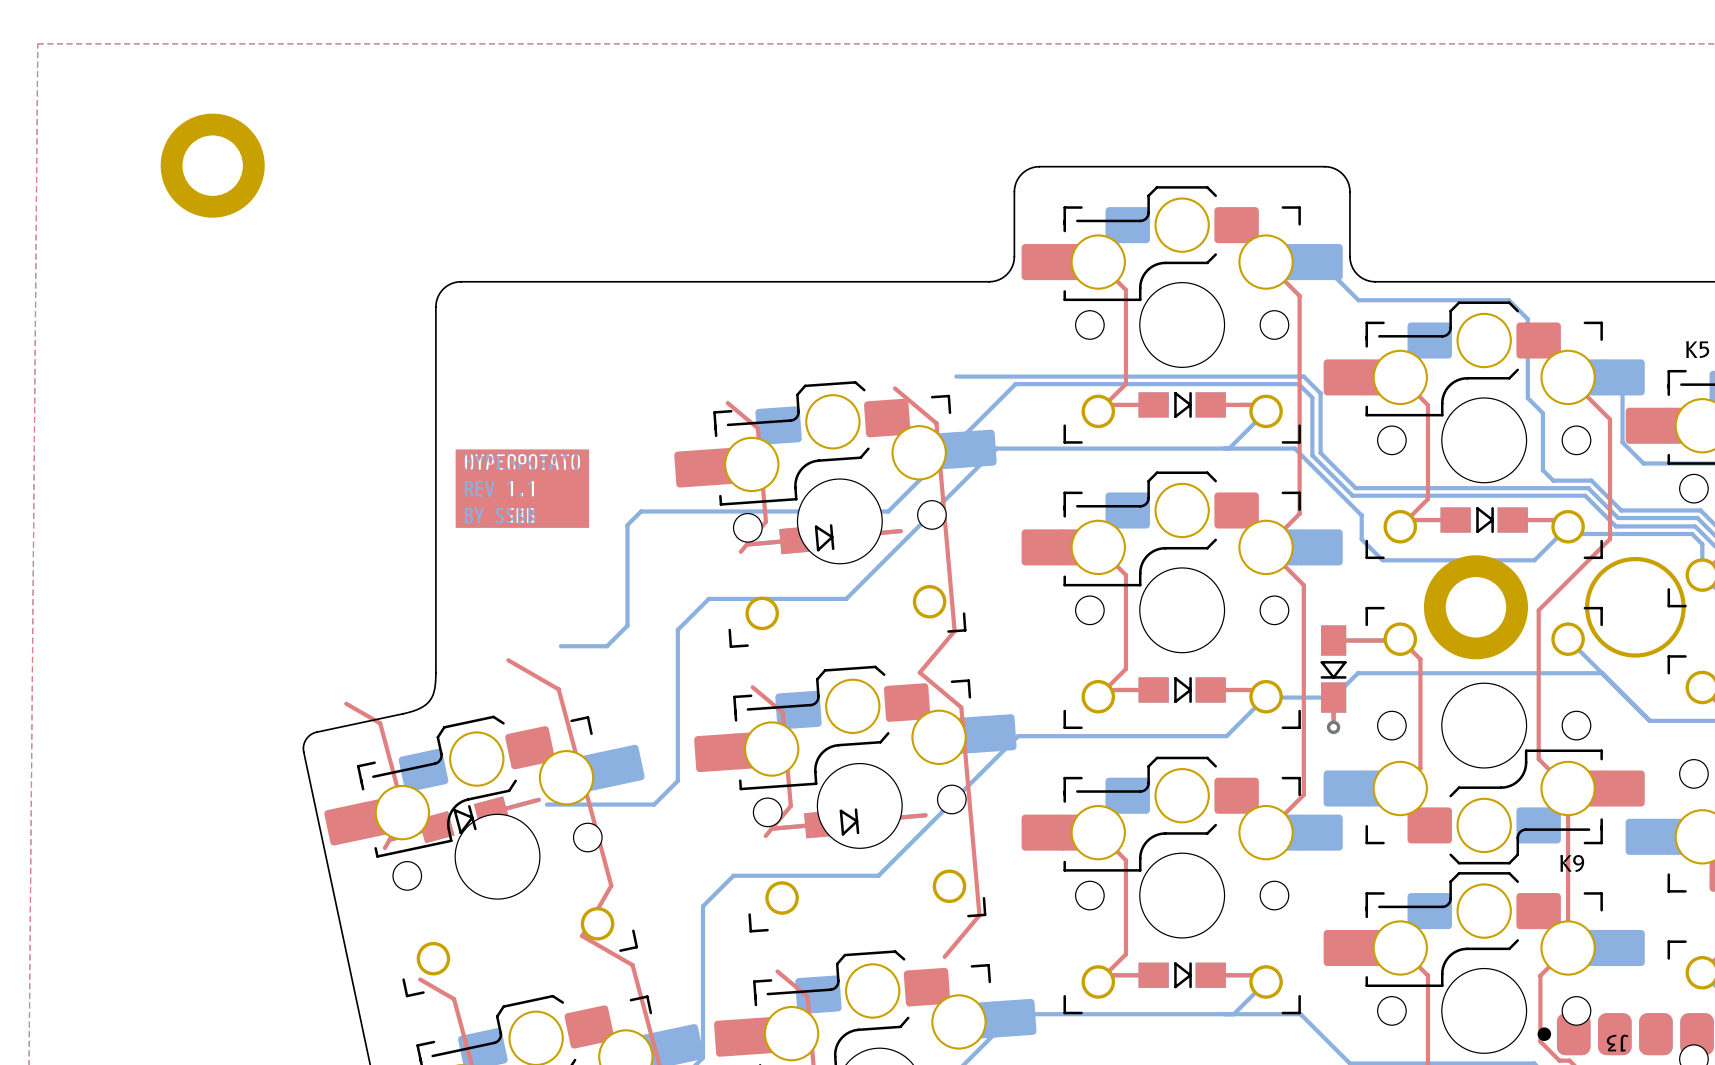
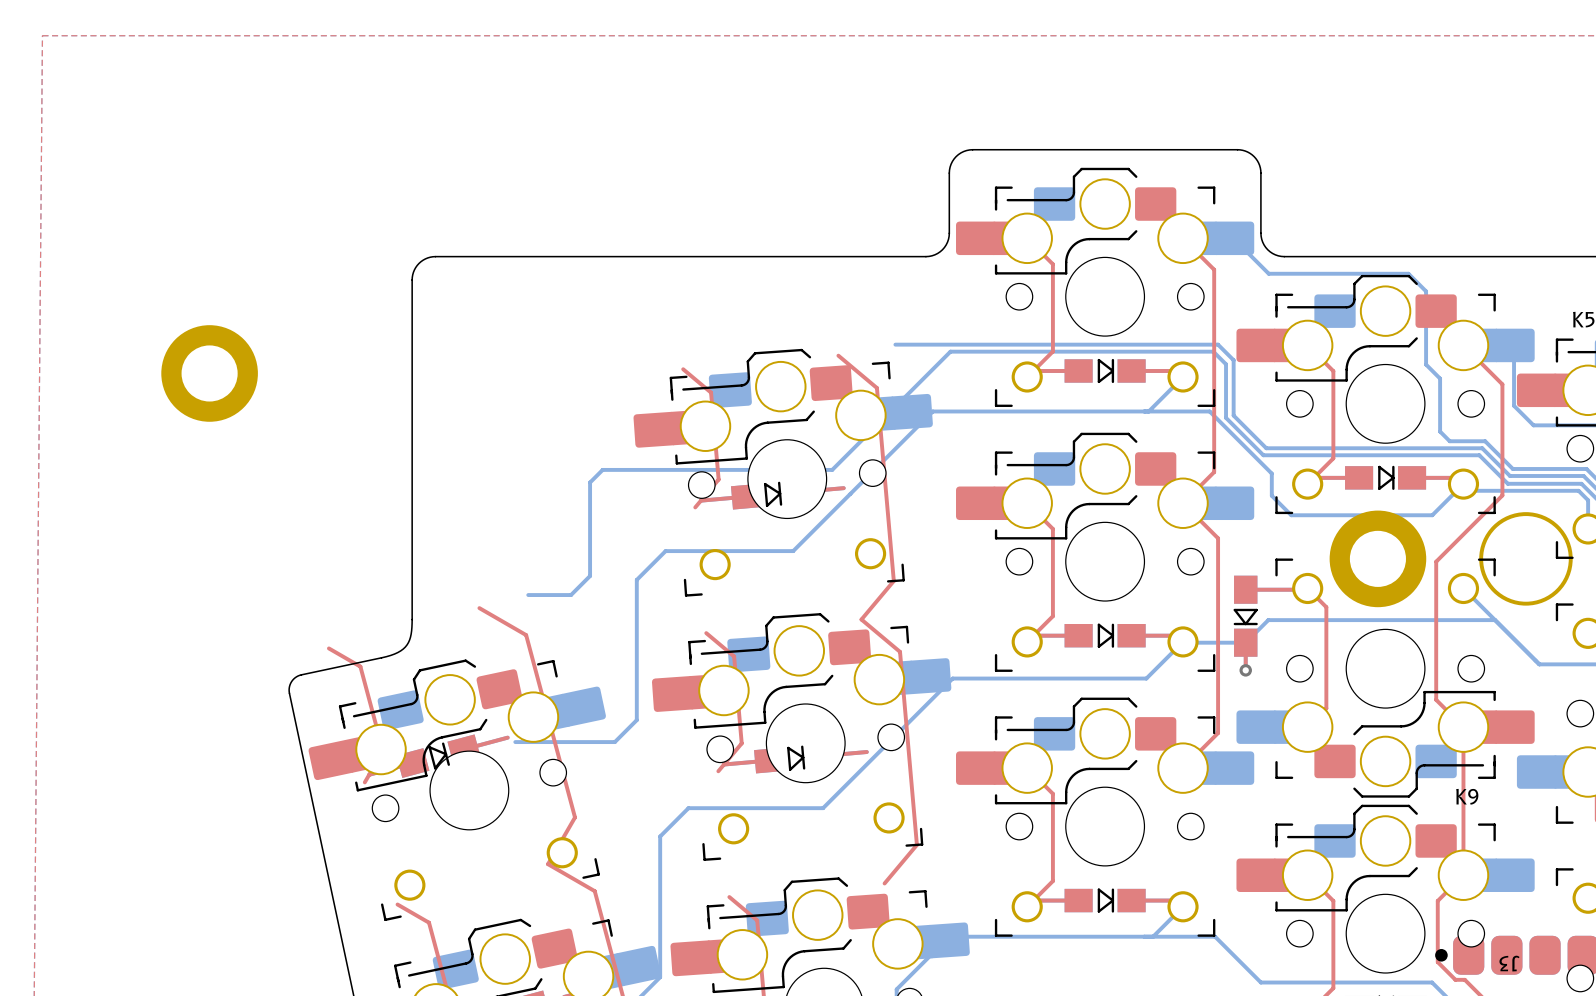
part position: (212, 165) -> (209, 373)
drawing: [455, 449, 590, 528] -> none

